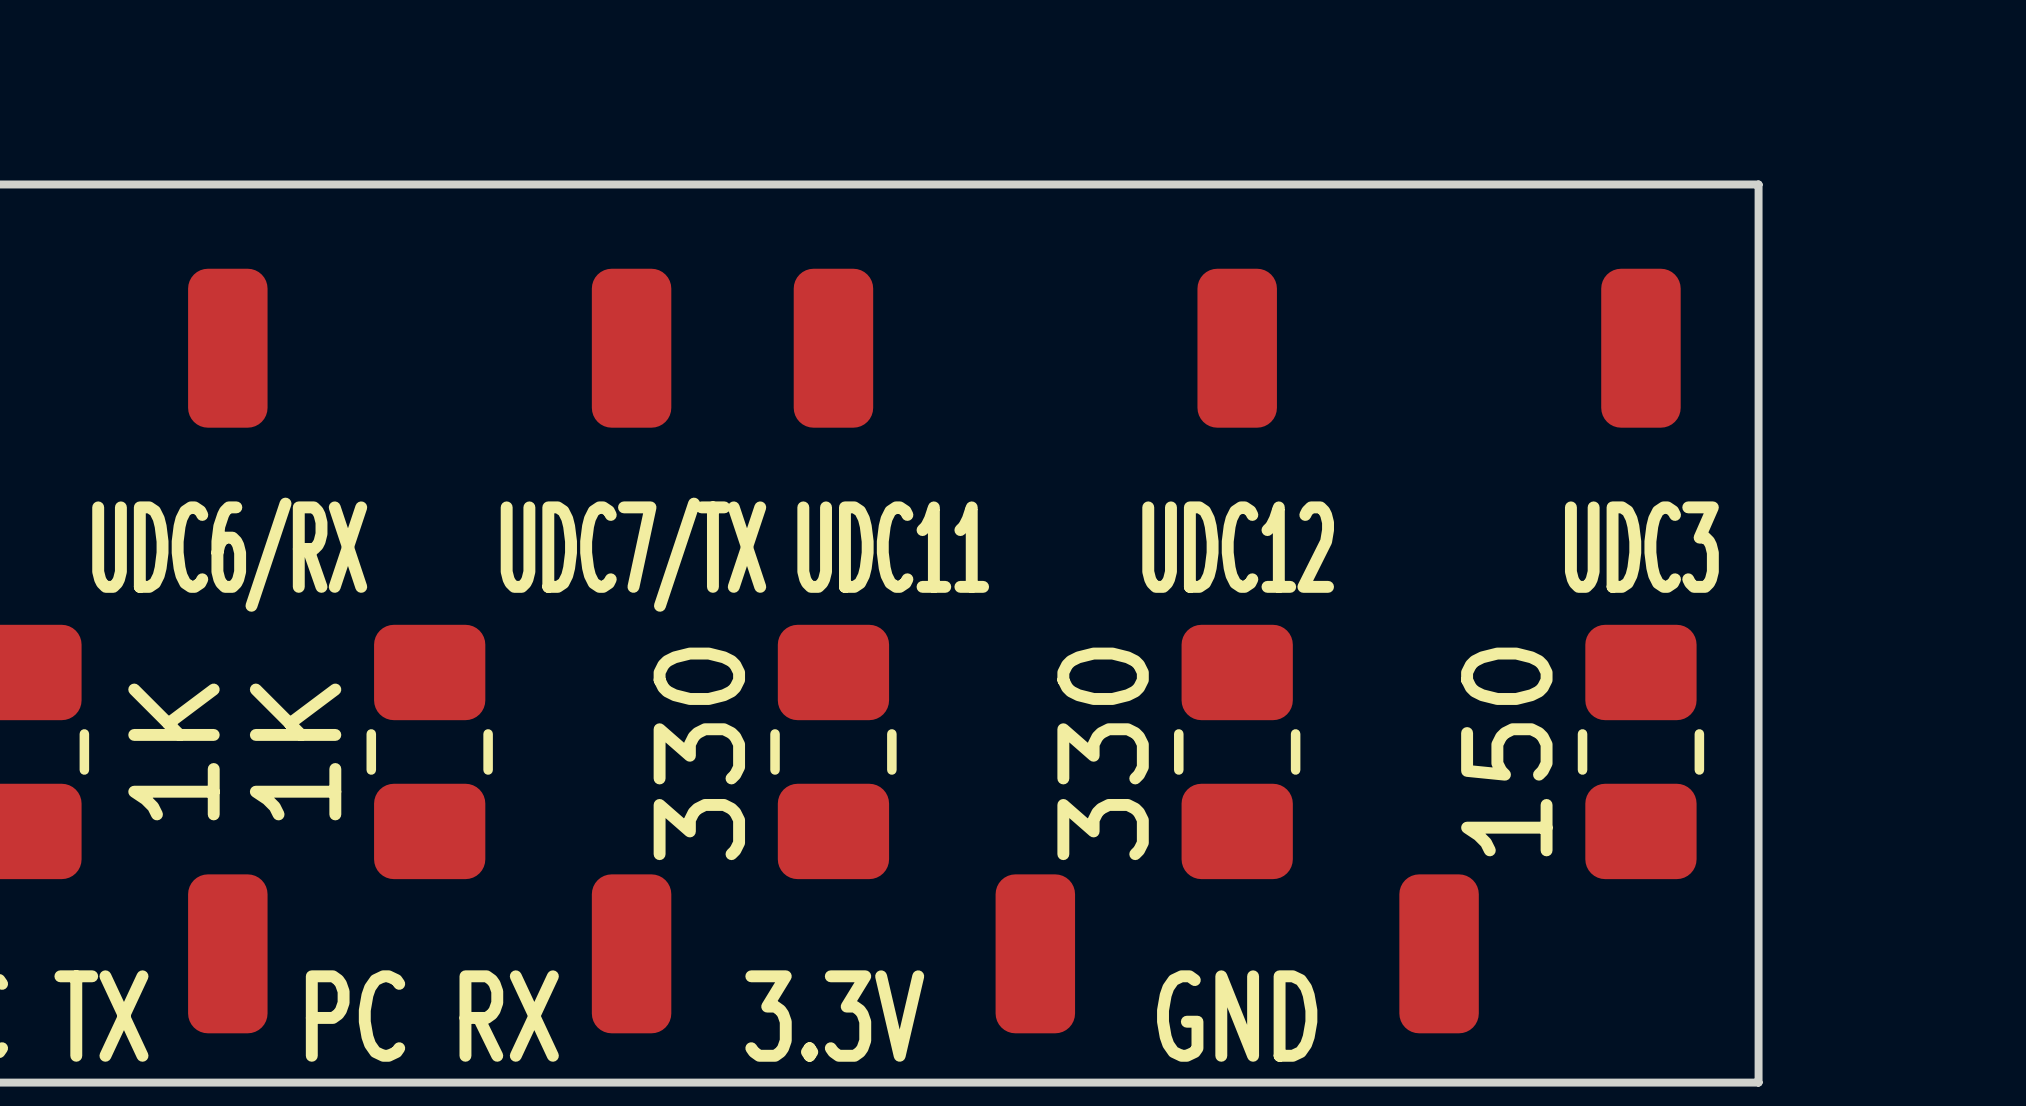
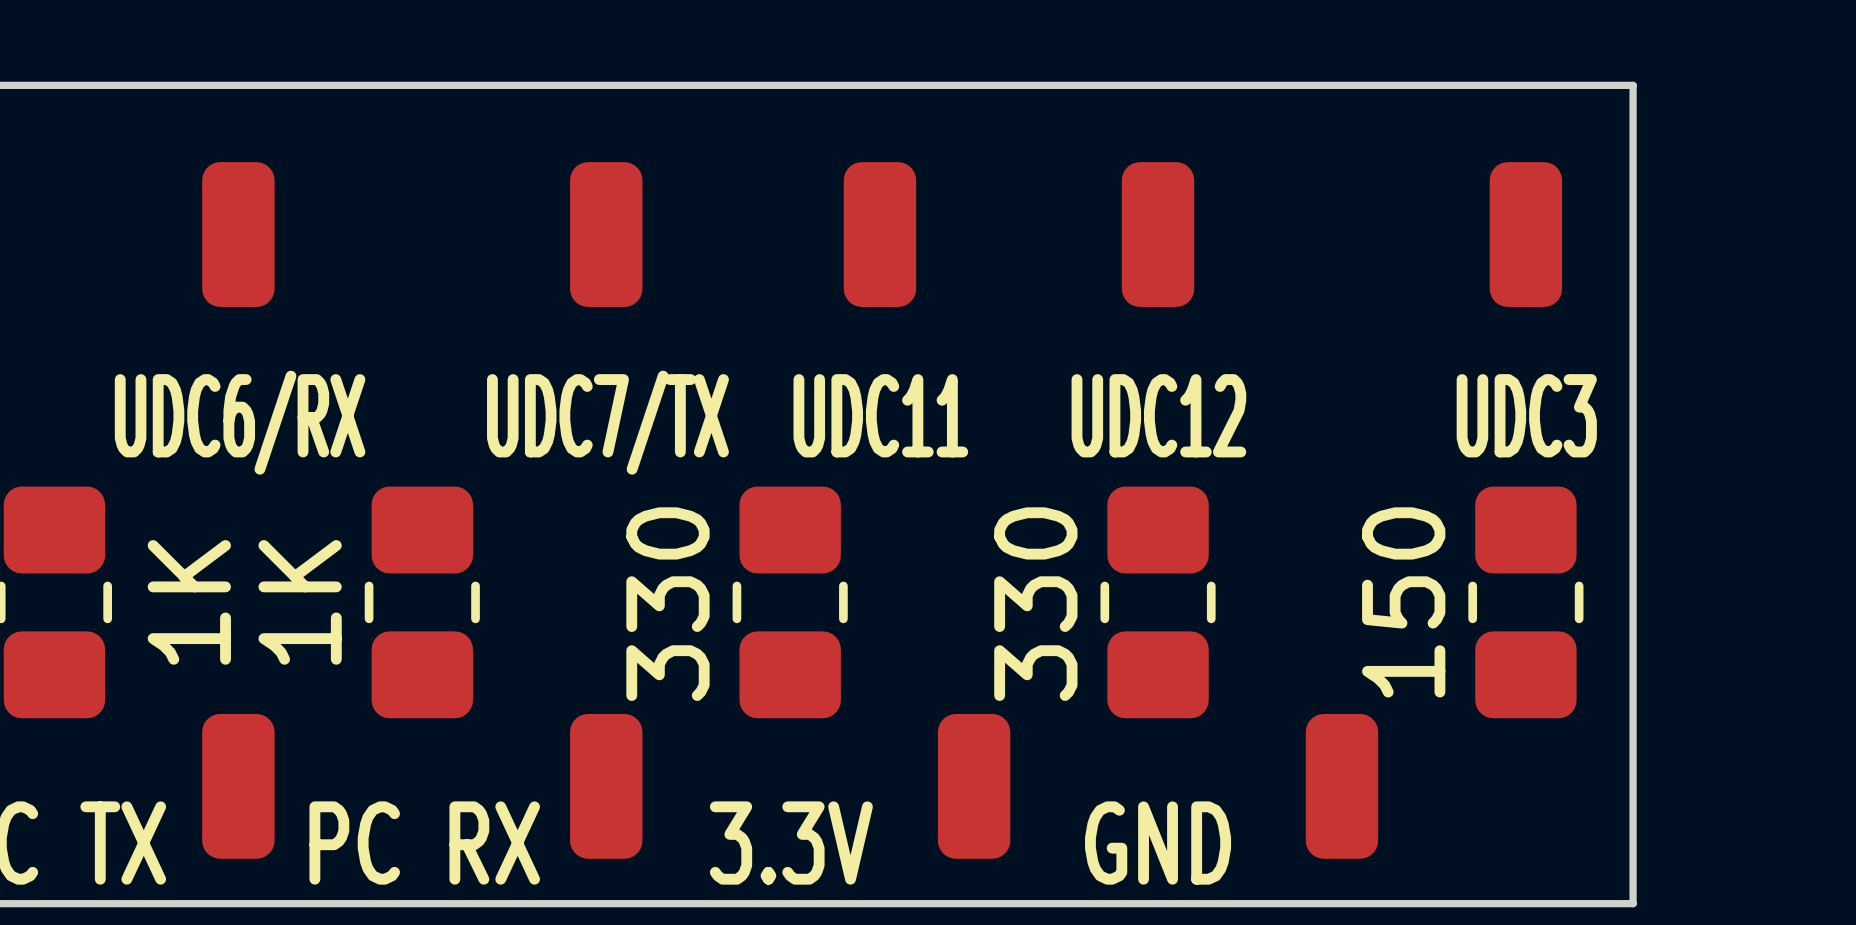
UDC11 position: (833, 348) -> (879, 234)
UDC11 name position: UDC11 (893, 547) -> UDC11 (880, 415)

